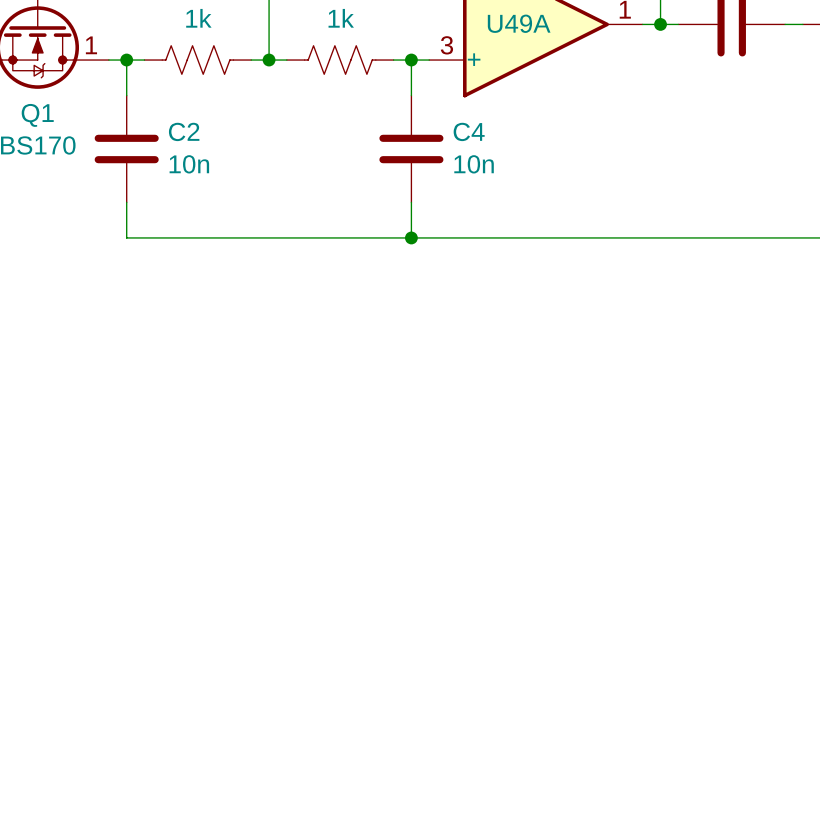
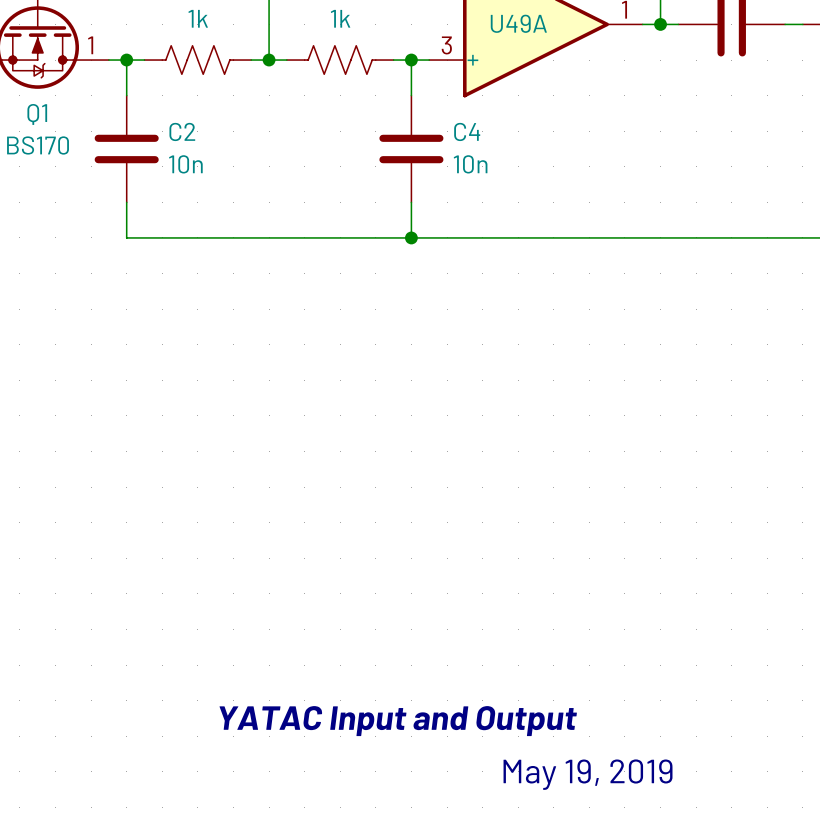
text: none -> YATAC Input and Output (398, 721)
text: none -> May 19, 2019 (588, 774)

